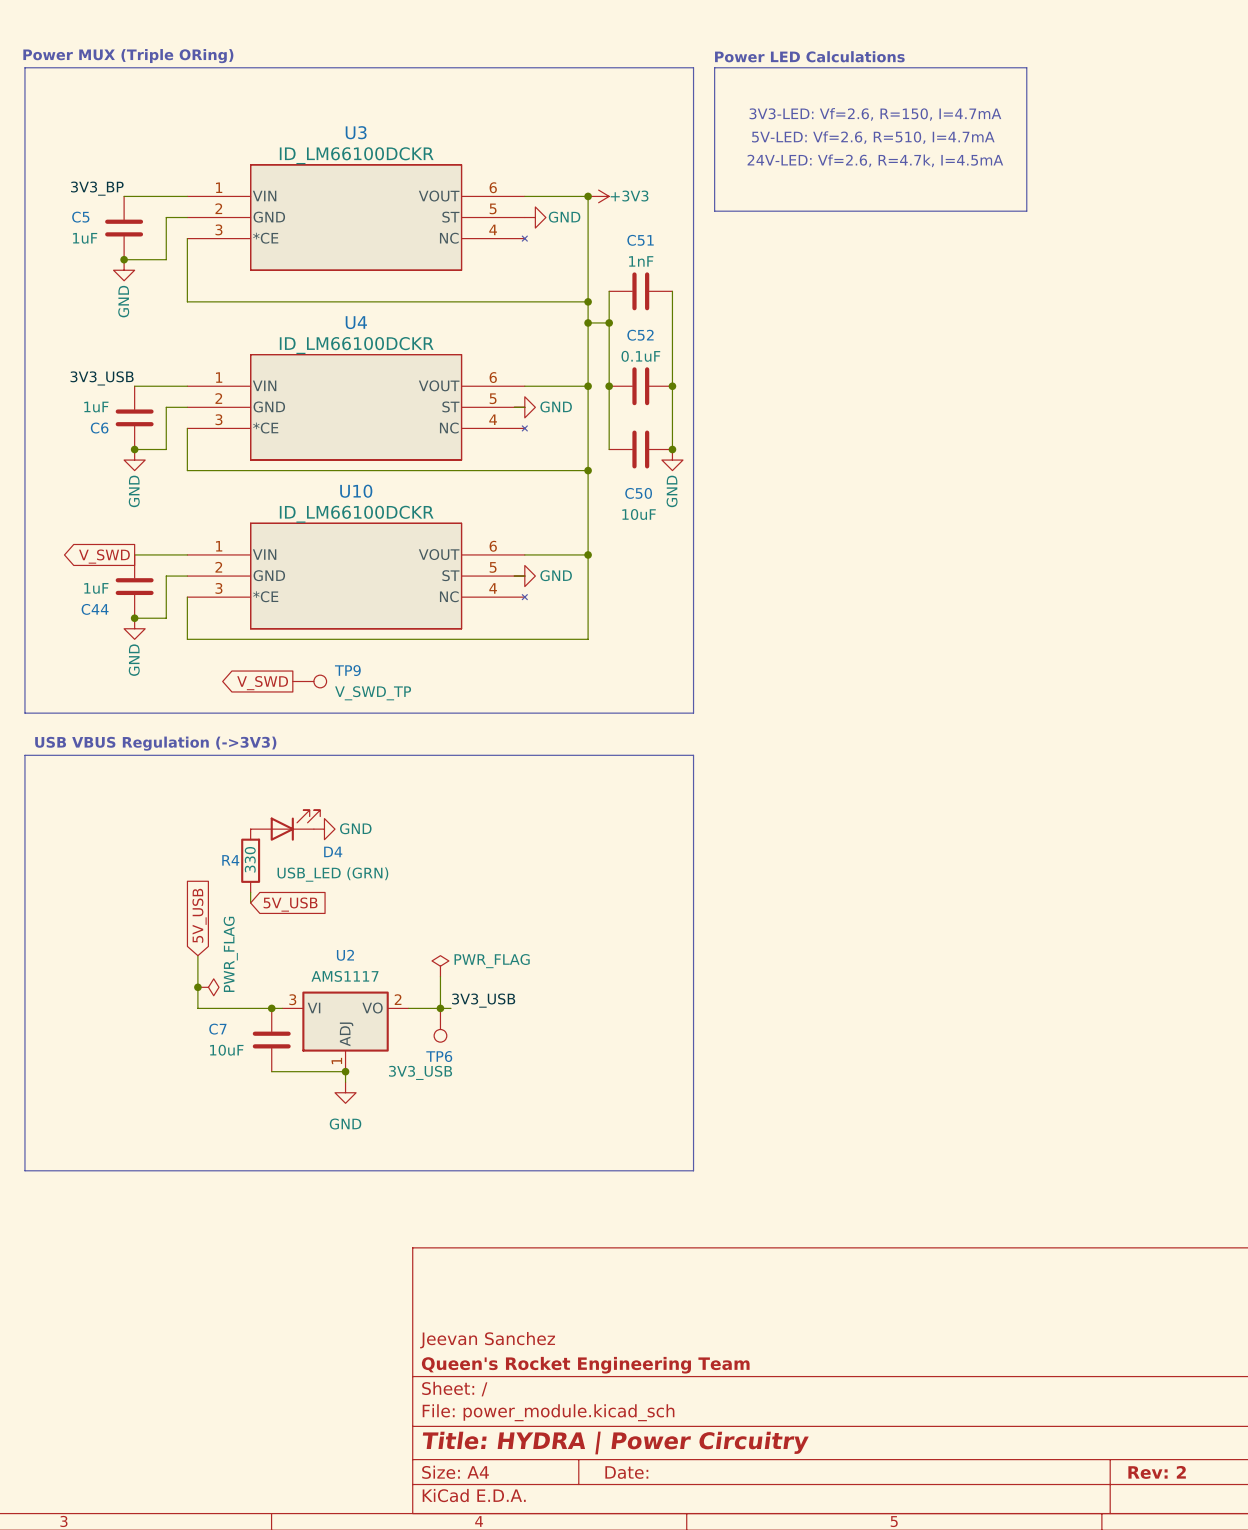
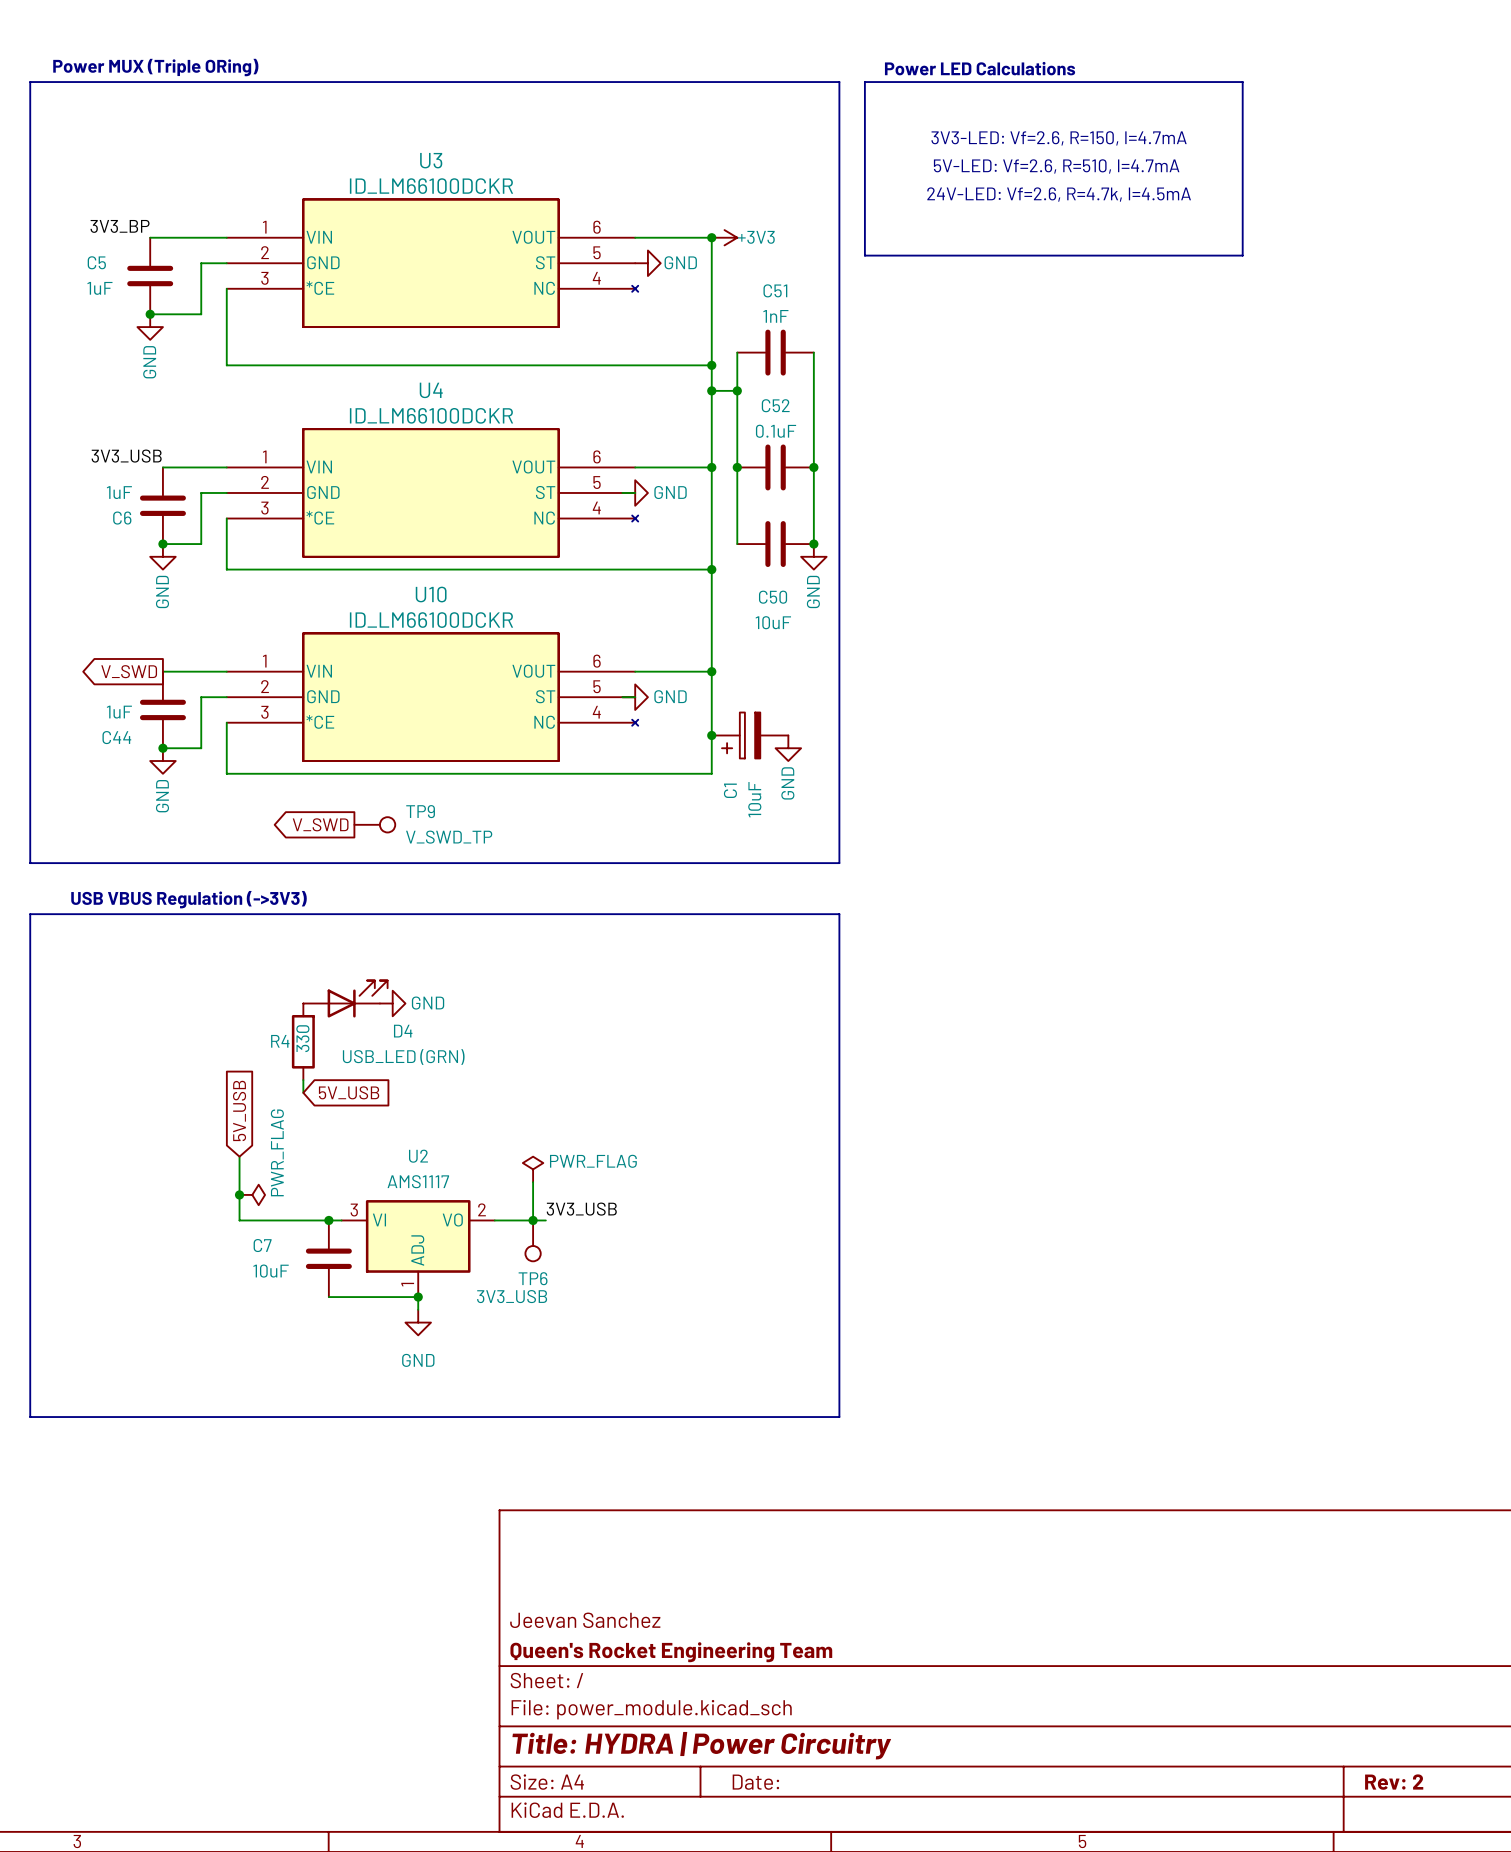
junction: none -> (711, 735)
C1: none -> 10uF (750, 735)
power symbol: none -> GND (788, 748)

